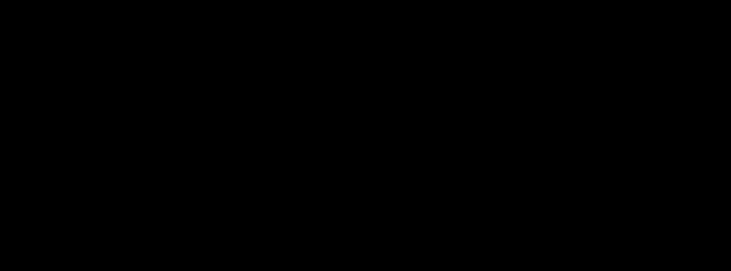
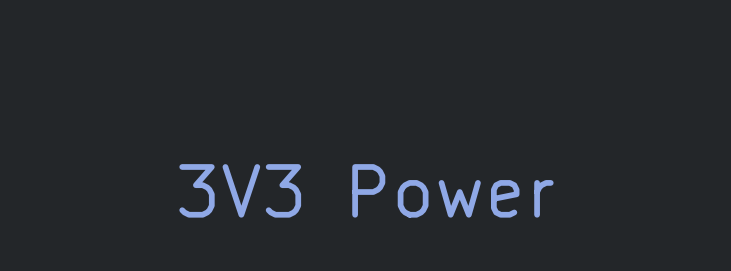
text: none -> 3V3 Power (366, 190)

